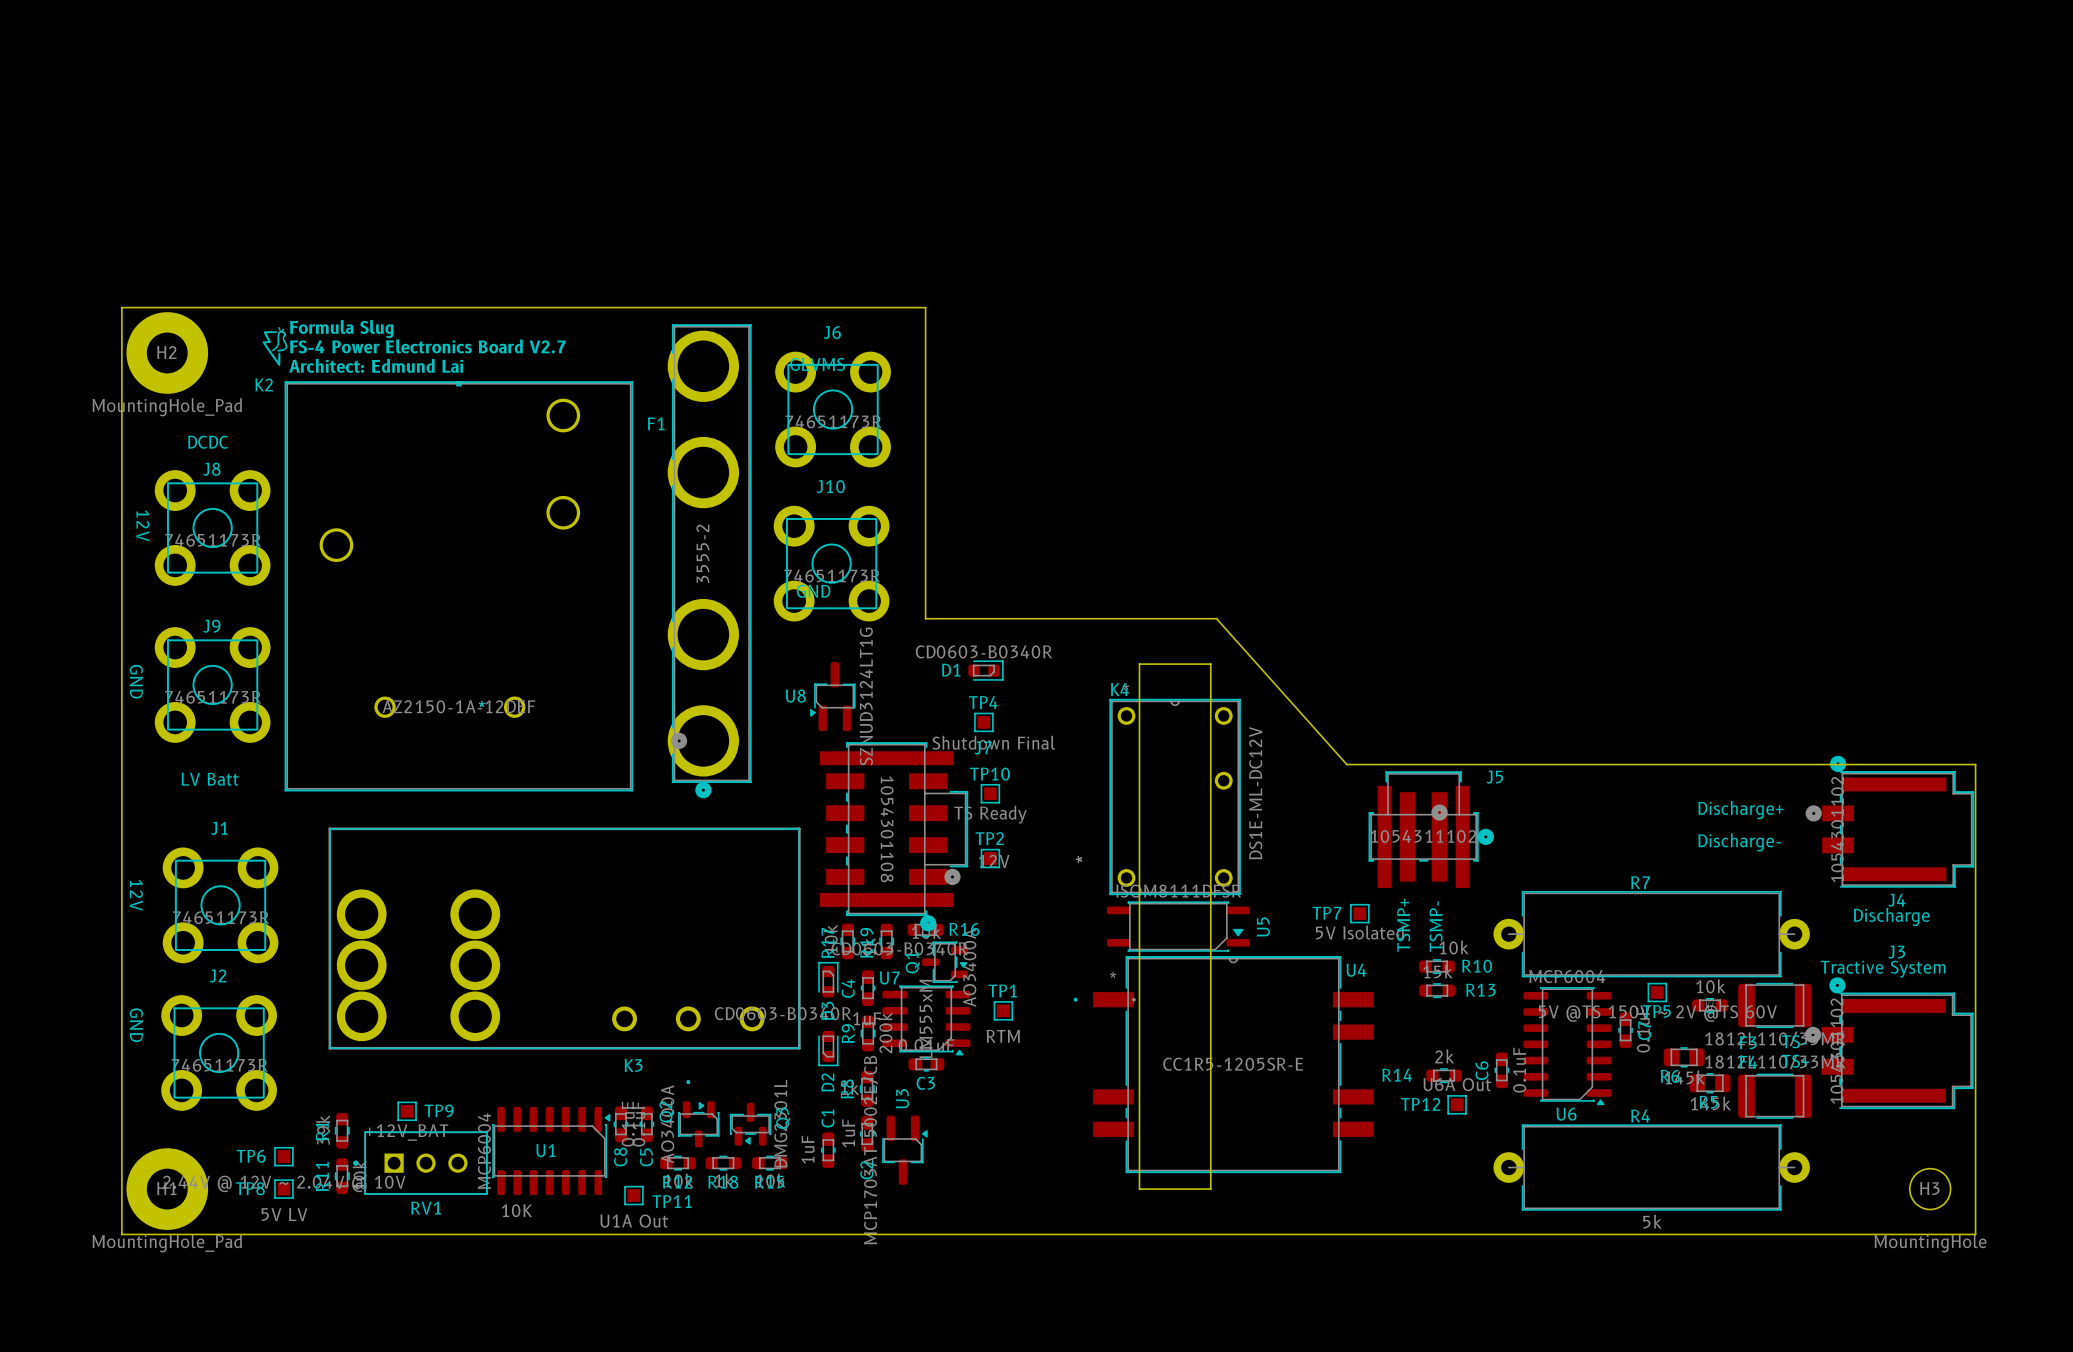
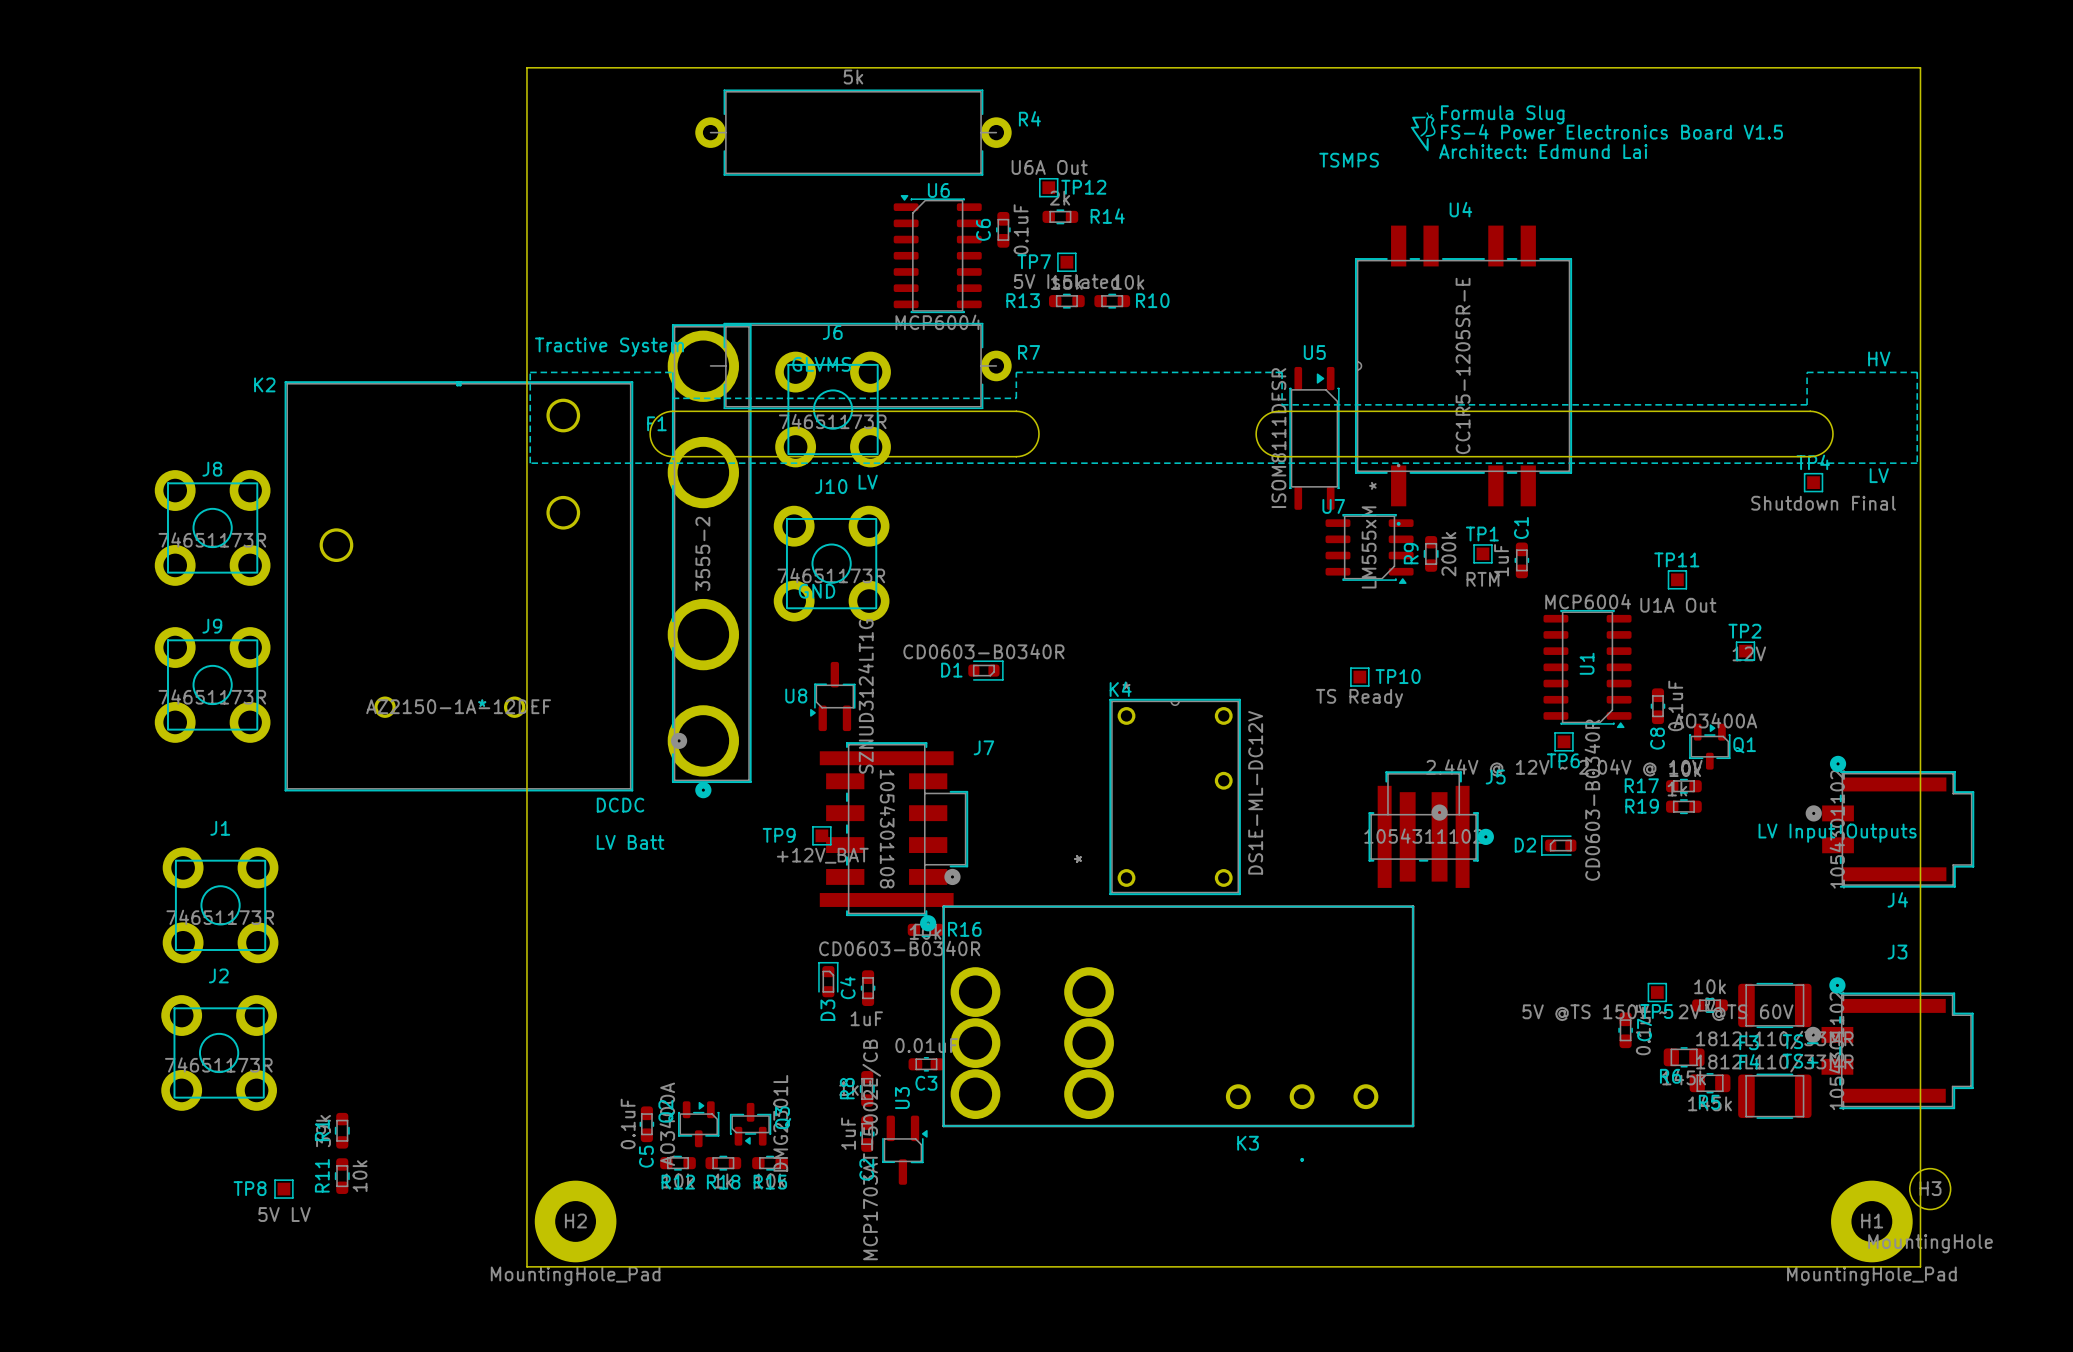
drawing: none -> [1410, 112, 1436, 152]
text: none -> TSMPS (1349, 160)
board edge: (121, 307) (925, 307) (925, 618) (1216, 618) (1346, 764) (1975, 764) (1975, 1234) (121, 1234) (121, 307) -> (526, 67) (526, 1266) (1920, 1266) (1920, 67) (526, 67)
drawing: [262, 327, 288, 366] -> none
text: none -> Tractive System (609, 347)
H2 position: (167, 352) -> (575, 1221)
text: none -> HV (1879, 358)
line: none -> (530, 372) (672, 372) (672, 398) (1016, 398) (1016, 372) (1282, 372) (1282, 404) (1807, 404) (1807, 372) (1917, 372) (1917, 463) (530, 463) (530, 372)
board edge: none -> (672, 411) (1019, 411) (1027, 414) (1034, 420) (1038, 428) (1038, 436) (1035, 445) (1030, 452) (1016, 456) (670, 456) (659, 452) (654, 446) (650, 431) (657, 417) (672, 411)
board edge: none -> (1278, 411) (1810, 411) (1825, 417) (1830, 423) (1832, 434) (1830, 444) (1825, 450) (1810, 456) (1278, 456) (1263, 450) (1257, 442) (1256, 434) (1257, 425) (1263, 417) (1278, 411)
text: DCDC (208, 442) -> none
text: none -> LV (1879, 475)
text: none -> LV (868, 482)
text: 12V (142, 525) -> none
board edge: (1139, 664) (1139, 1189) (1210, 1189) (1210, 664) (1139, 664) -> none
text: GND (136, 681) -> none
TP4 position: (983, 722) -> (1813, 482)
TP10 name position: TP10 (989, 774) -> TP10 (1398, 676)
text: LV Batt (210, 779) -> none
TP10 position: (990, 793) -> (1359, 677)
text: none -> DCDC (620, 805)
text: Discharge+ (1740, 810) -> none
text: none -> LV Input Outputs (1837, 833)
text: none -> LV Batt (630, 842)
text: Discharge- (1739, 842) -> none
TP2 position: (990, 858) -> (1745, 651)
R7 name position: R7 (1640, 882) -> R7 (1029, 352)
text: 12V (136, 895) -> none
TP7 position: (1359, 913) -> (1066, 262)
text: Discharge (1891, 917) -> none
text: TSMP+ (1403, 925) -> none
U5 rotation: 0° (1178, 926) -> 90° counterclockwise (1314, 438)
U5 position: (1178, 926) -> (1314, 438)
text: TSMP- (1436, 926) -> none
R7 position: (1651, 934) -> (853, 365)
R17 rotation: 0° (847, 941) -> 90° clockwise (1683, 786)
R17 position: (847, 941) -> (1683, 786)
R19 rotation: 0° (886, 941) -> 90° clockwise (1683, 806)
R19 position: (886, 941) -> (1683, 806)
K3 position: (564, 955) -> (1178, 1033)
Q1 name position: Q1 (912, 962) -> Q1 (1744, 745)
Q1 rotation: 0° (945, 962) -> 90° counterclockwise (1709, 746)
Q1 position: (945, 962) -> (1709, 746)
R10 position: (1436, 966) -> (1112, 301)
text: Tractive System (1883, 969) -> none
U4 name position: U4 (1356, 970) -> U4 (1460, 209)
R13 position: (1437, 990) -> (1066, 301)
R13 name position: R13 (1480, 990) -> R13 (1023, 300)
TP1 position: (1003, 1010) -> (1482, 553)
U7 position: (926, 1020) -> (1369, 548)
text: GND (136, 1025) -> none
R9 position: (868, 1033) -> (1431, 553)
U6 rotation: 0° (1567, 1046) -> 180° (937, 254)
U6 position: (1567, 1046) -> (937, 254)
D2 rotation: 0° (828, 1048) -> 90° clockwise (1558, 845)
D2 position: (828, 1048) -> (1558, 845)
U4 rotation: 0° (1223, 1064) -> 90° counterclockwise (1463, 375)
U4 position: (1223, 1064) -> (1463, 375)
C6 position: (1501, 1070) -> (1003, 229)
R14 name position: R14 (1397, 1075) -> R14 (1107, 216)
R14 position: (1444, 1075) -> (1060, 216)
TP12 name position: TP12 (1420, 1104) -> TP12 (1083, 187)
TP12 position: (1457, 1104) -> (1048, 187)
TP9 name position: TP9 (439, 1110) -> TP9 (779, 835)
TP9 position: (407, 1111) -> (821, 835)
R4 name position: R4 (1640, 1116) -> R4 (1029, 118)
C8 position: (620, 1124) -> (1657, 706)
C1 position: (828, 1150) -> (1521, 560)
U1 rotation: 0° (551, 1151) -> 90° clockwise (1587, 669)
U1 position: (551, 1151) -> (1587, 669)
TP6 name position: TP6 (251, 1156) -> TP6 (1563, 760)
TP6 position: (283, 1156) -> (1564, 741)
RV1: 10K (420, 1163) -> none
R4 position: (1651, 1167) -> (853, 132)
H1 position: (167, 1189) -> (1871, 1221)
TP11 position: (633, 1195) -> (1677, 579)
TP11 name position: TP11 (672, 1201) -> TP11 (1676, 559)
R4 value position: 5k (1652, 1221) -> 5k (853, 77)

